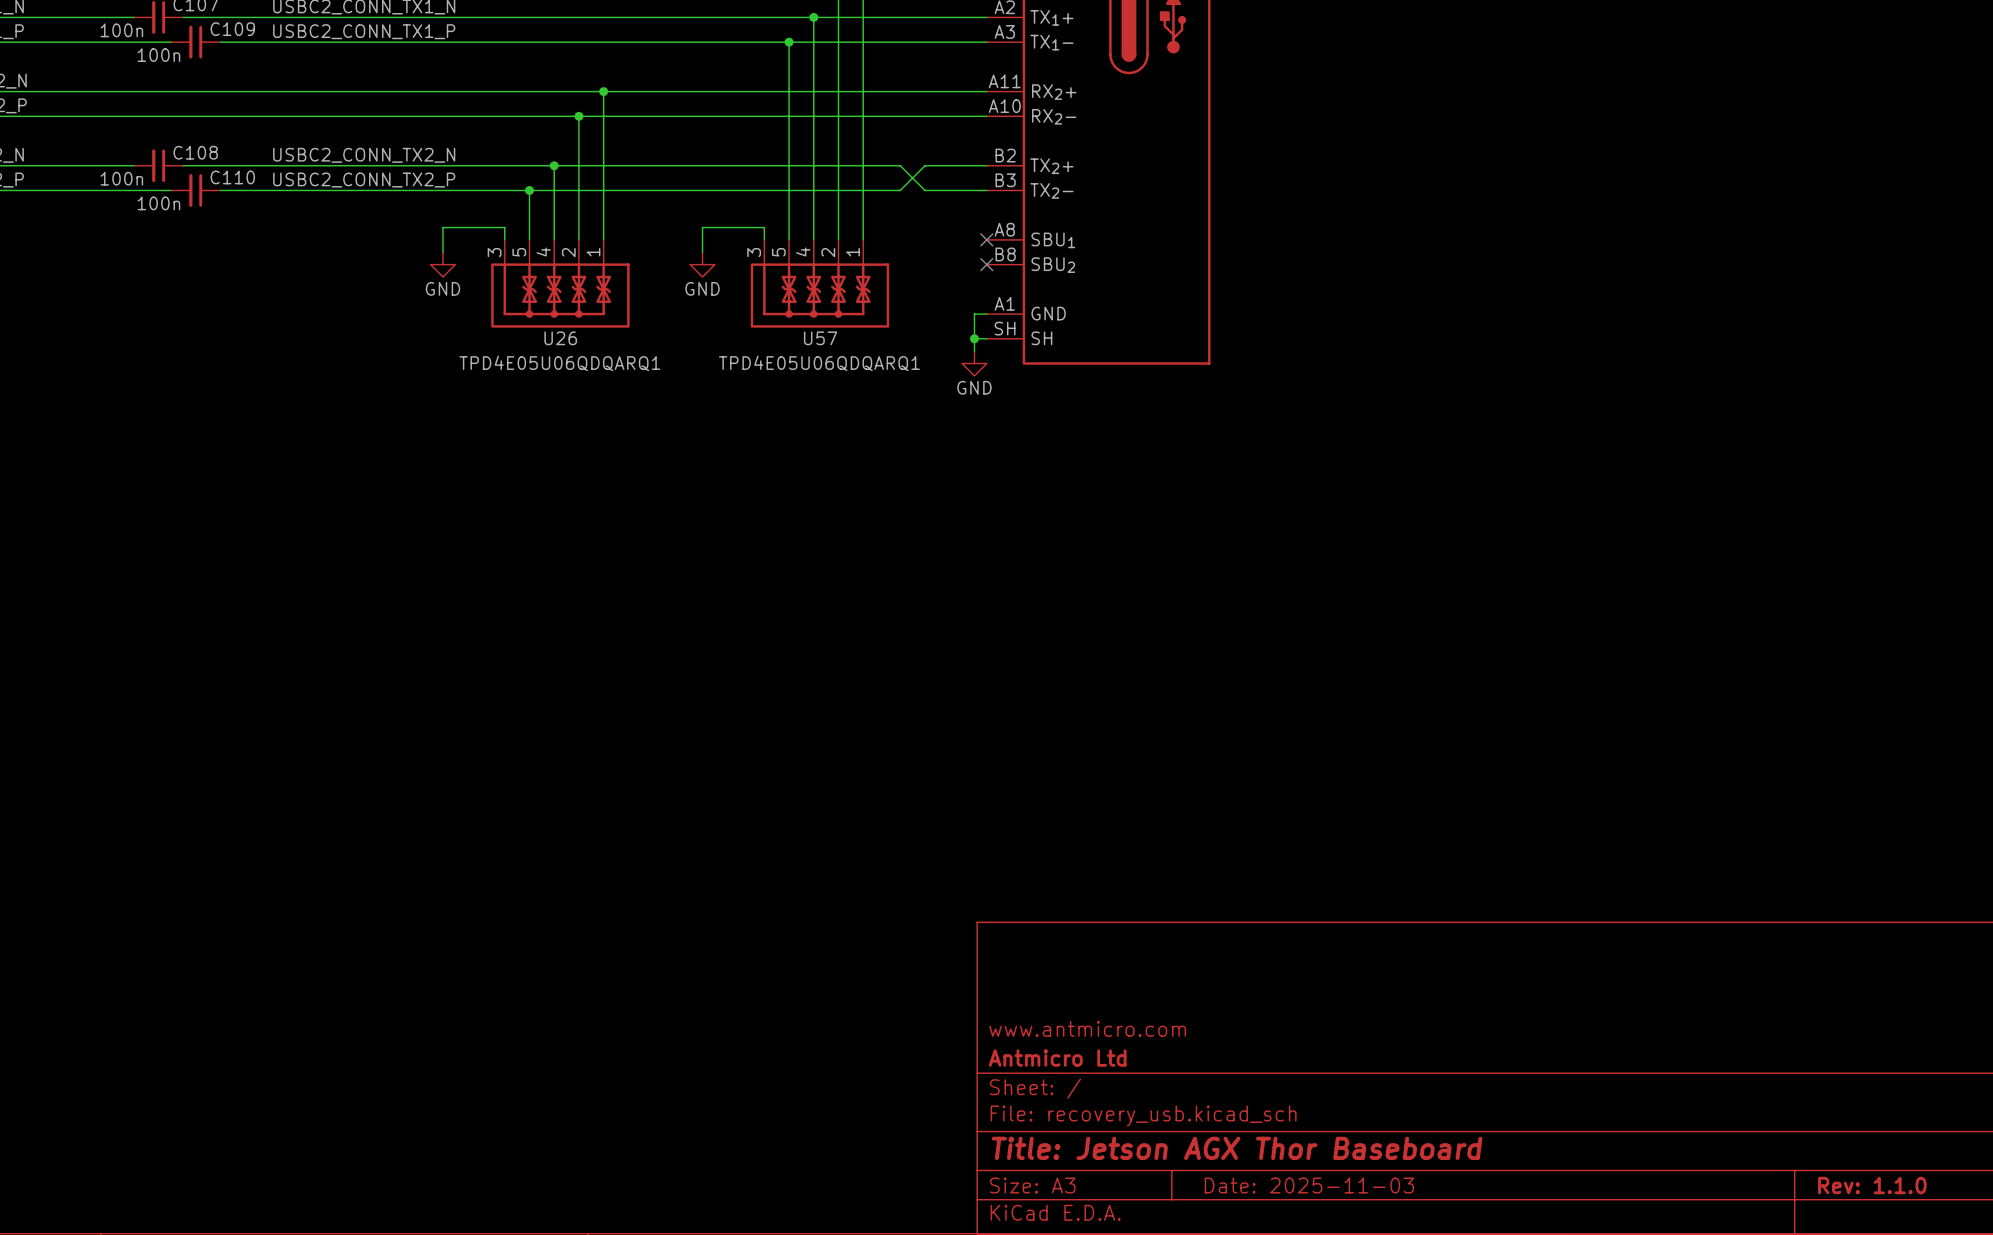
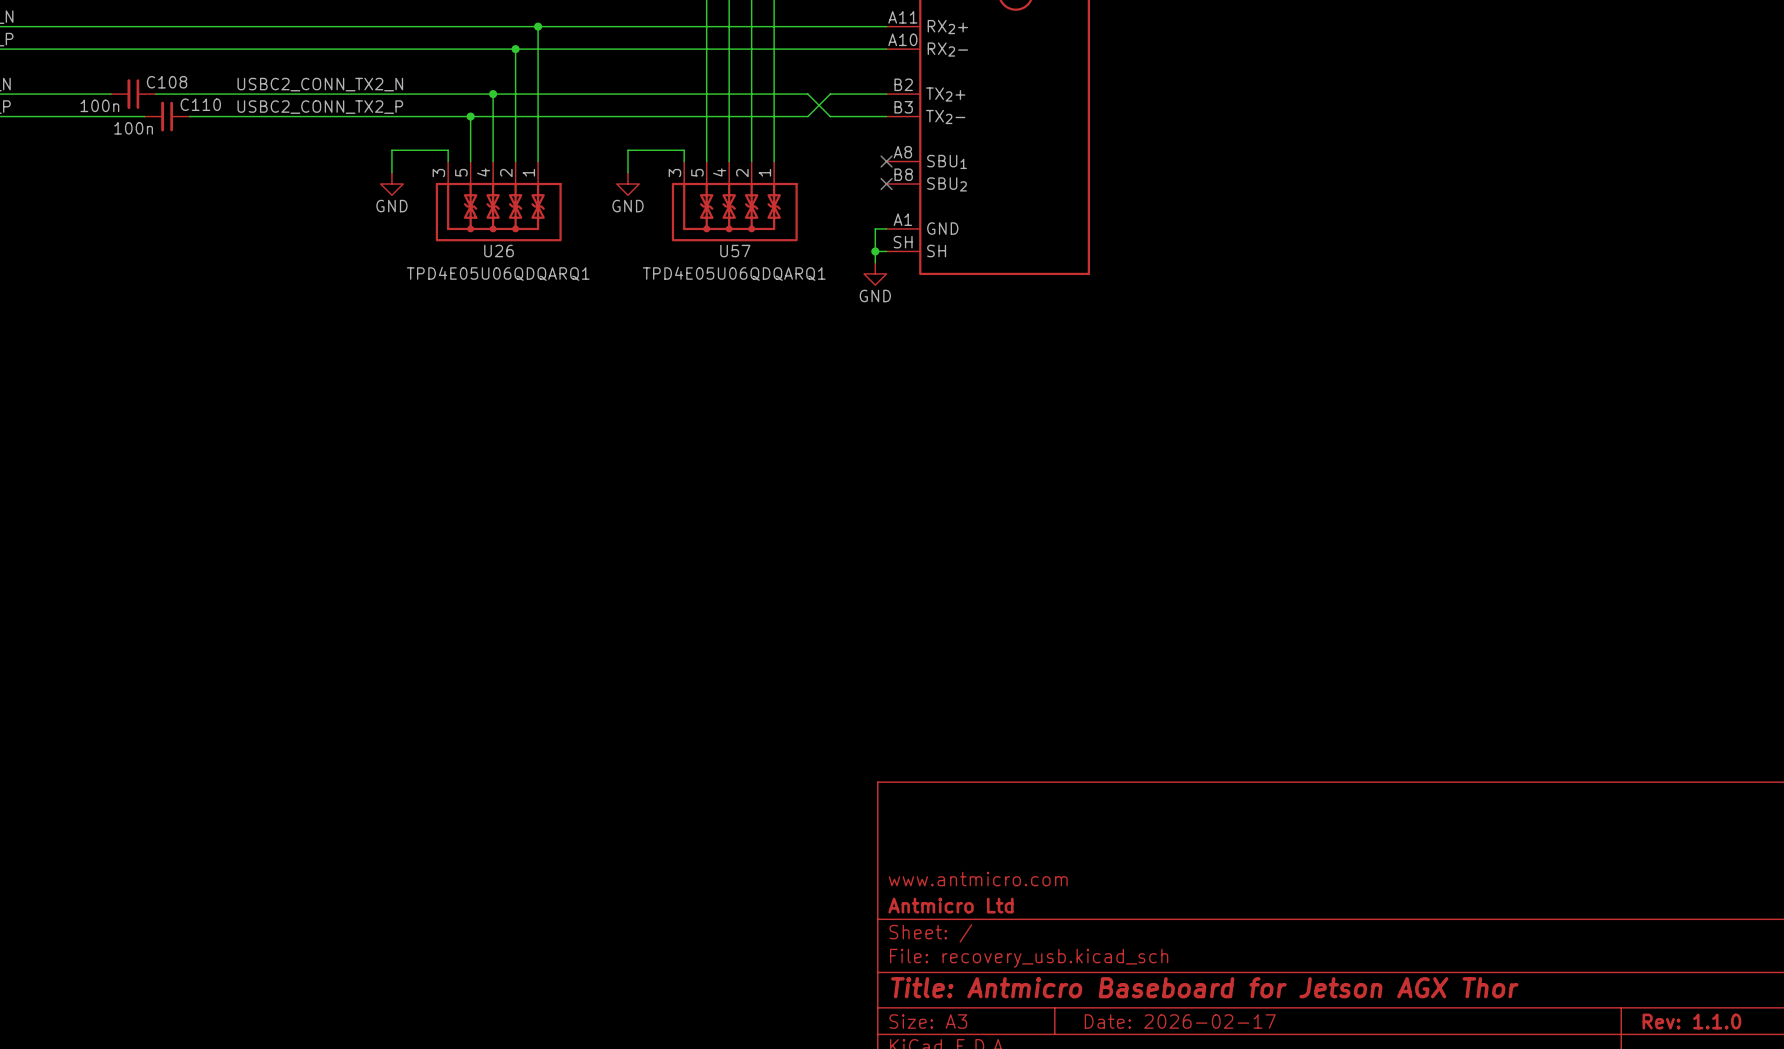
title block: Title: Jetson AGX Thor Baseboard (1237, 1148) -> Title: Antmicro Baseboard for Jetson AGX Thor (1204, 987)
title block: Date: 2025-11-03 (1309, 1185) -> Date: 2026-02-17 (1180, 1021)

